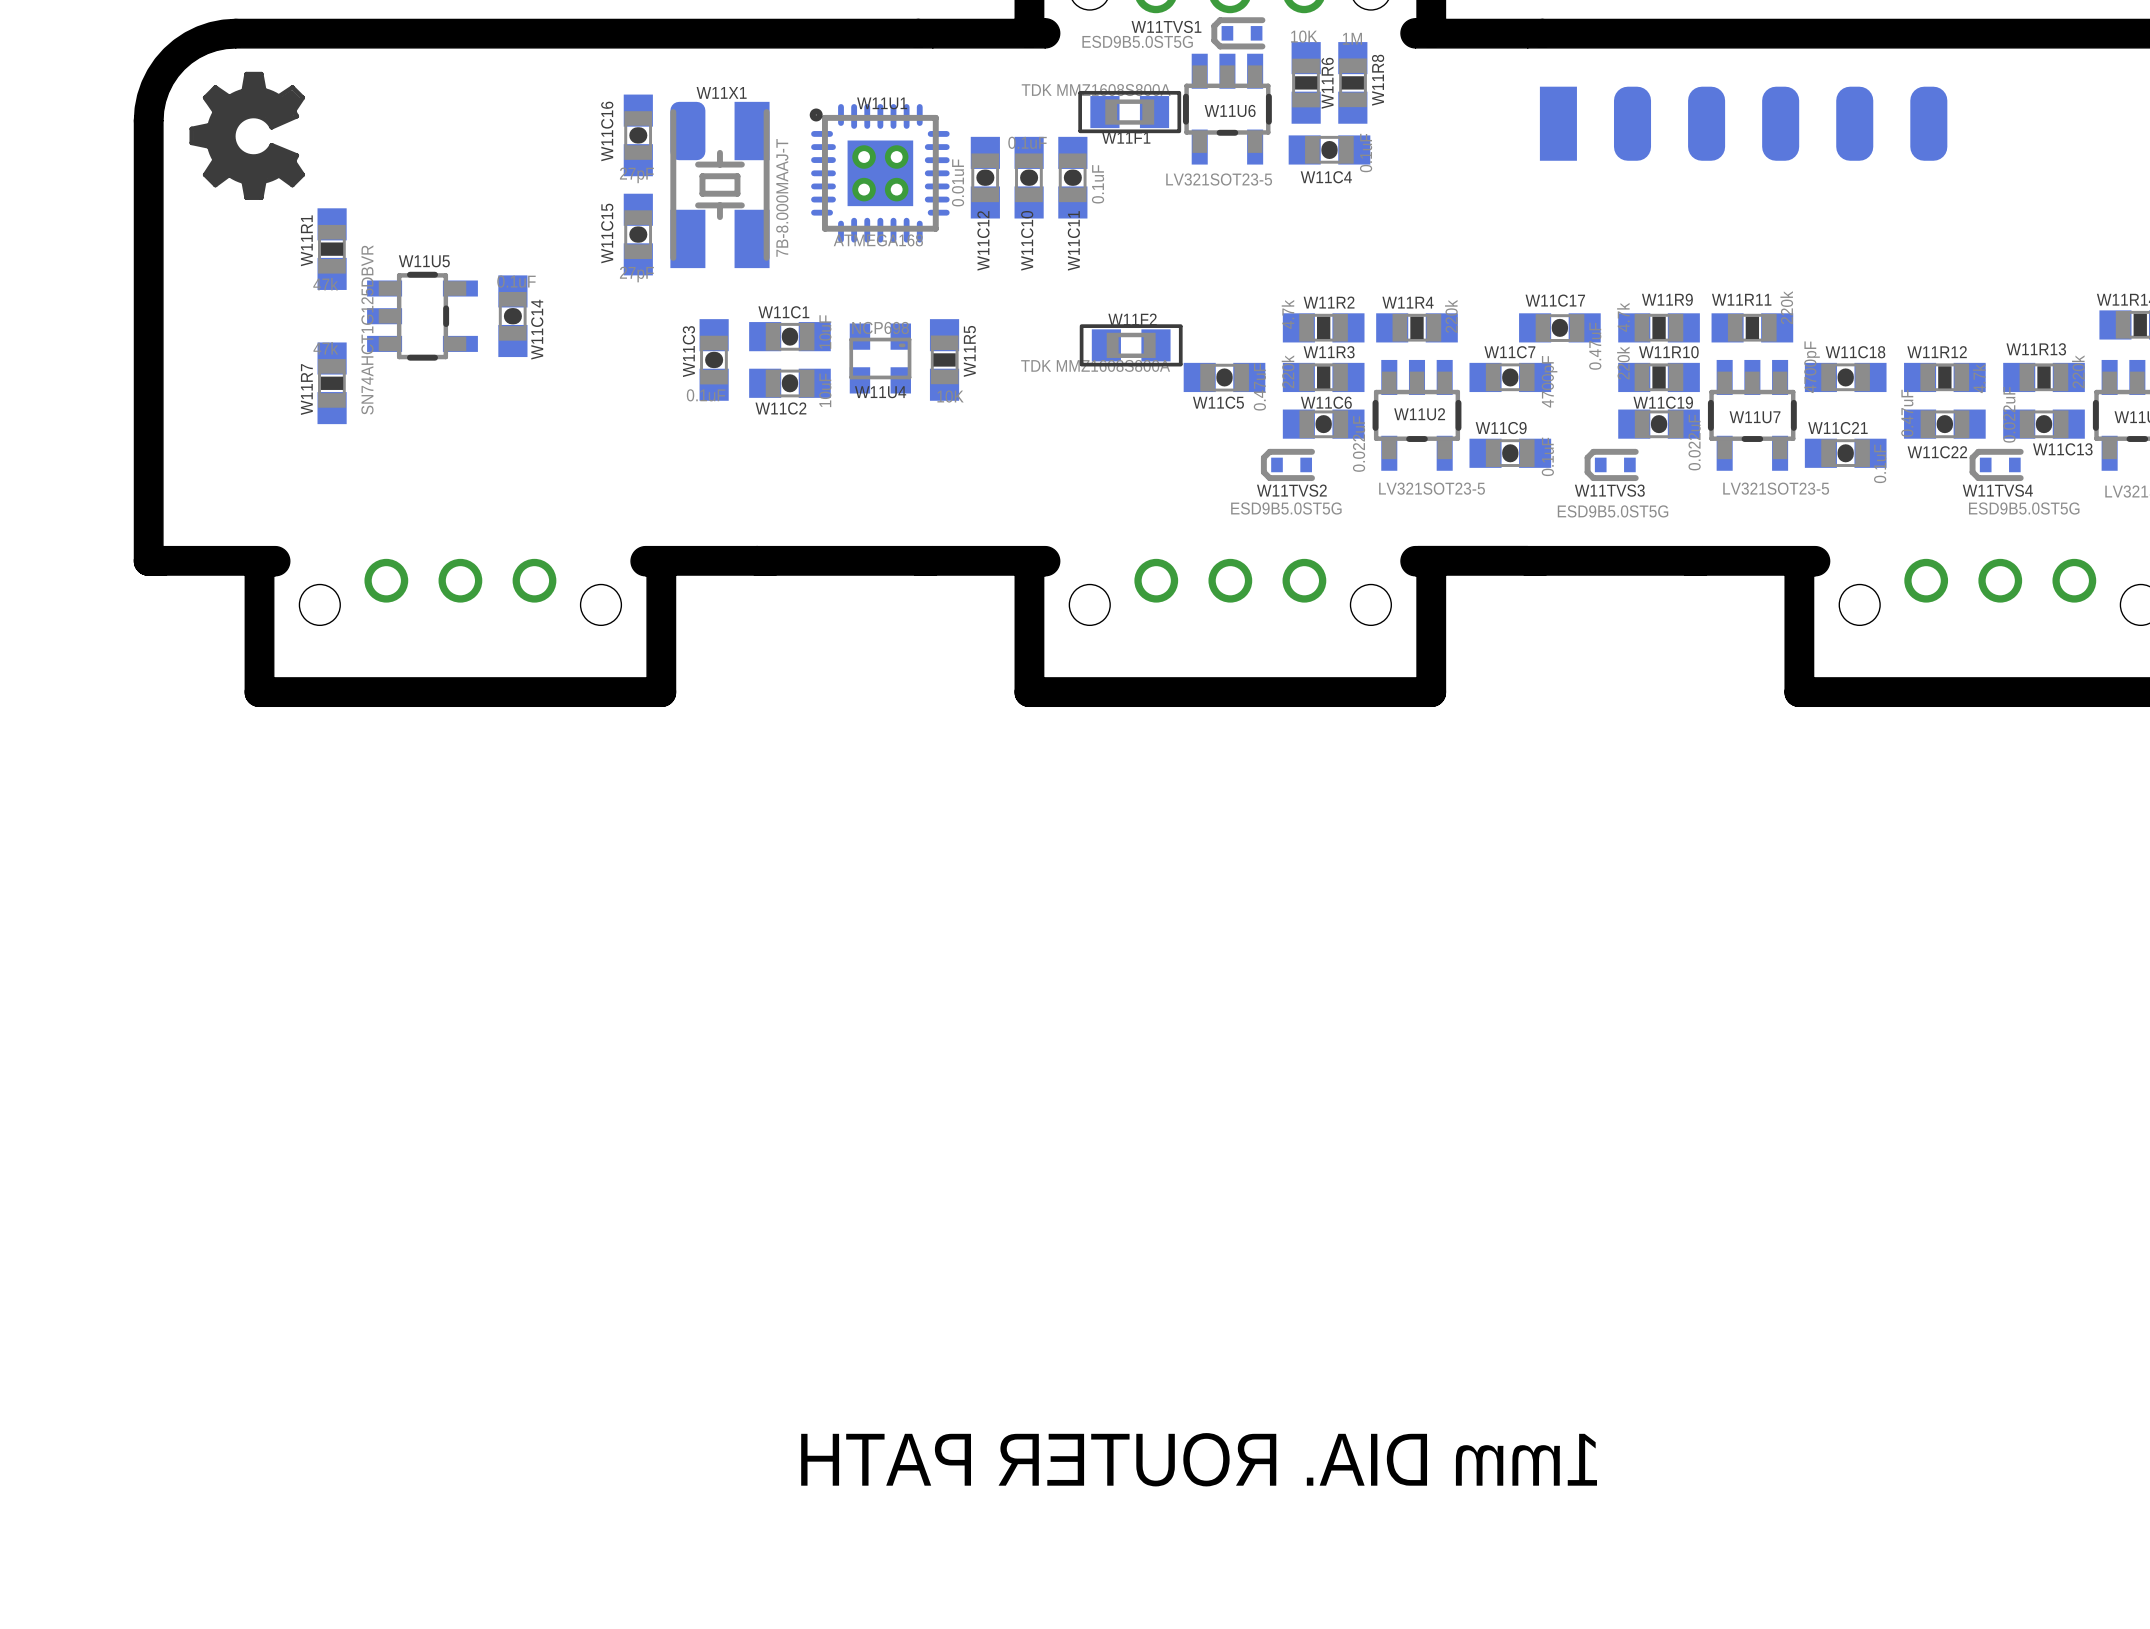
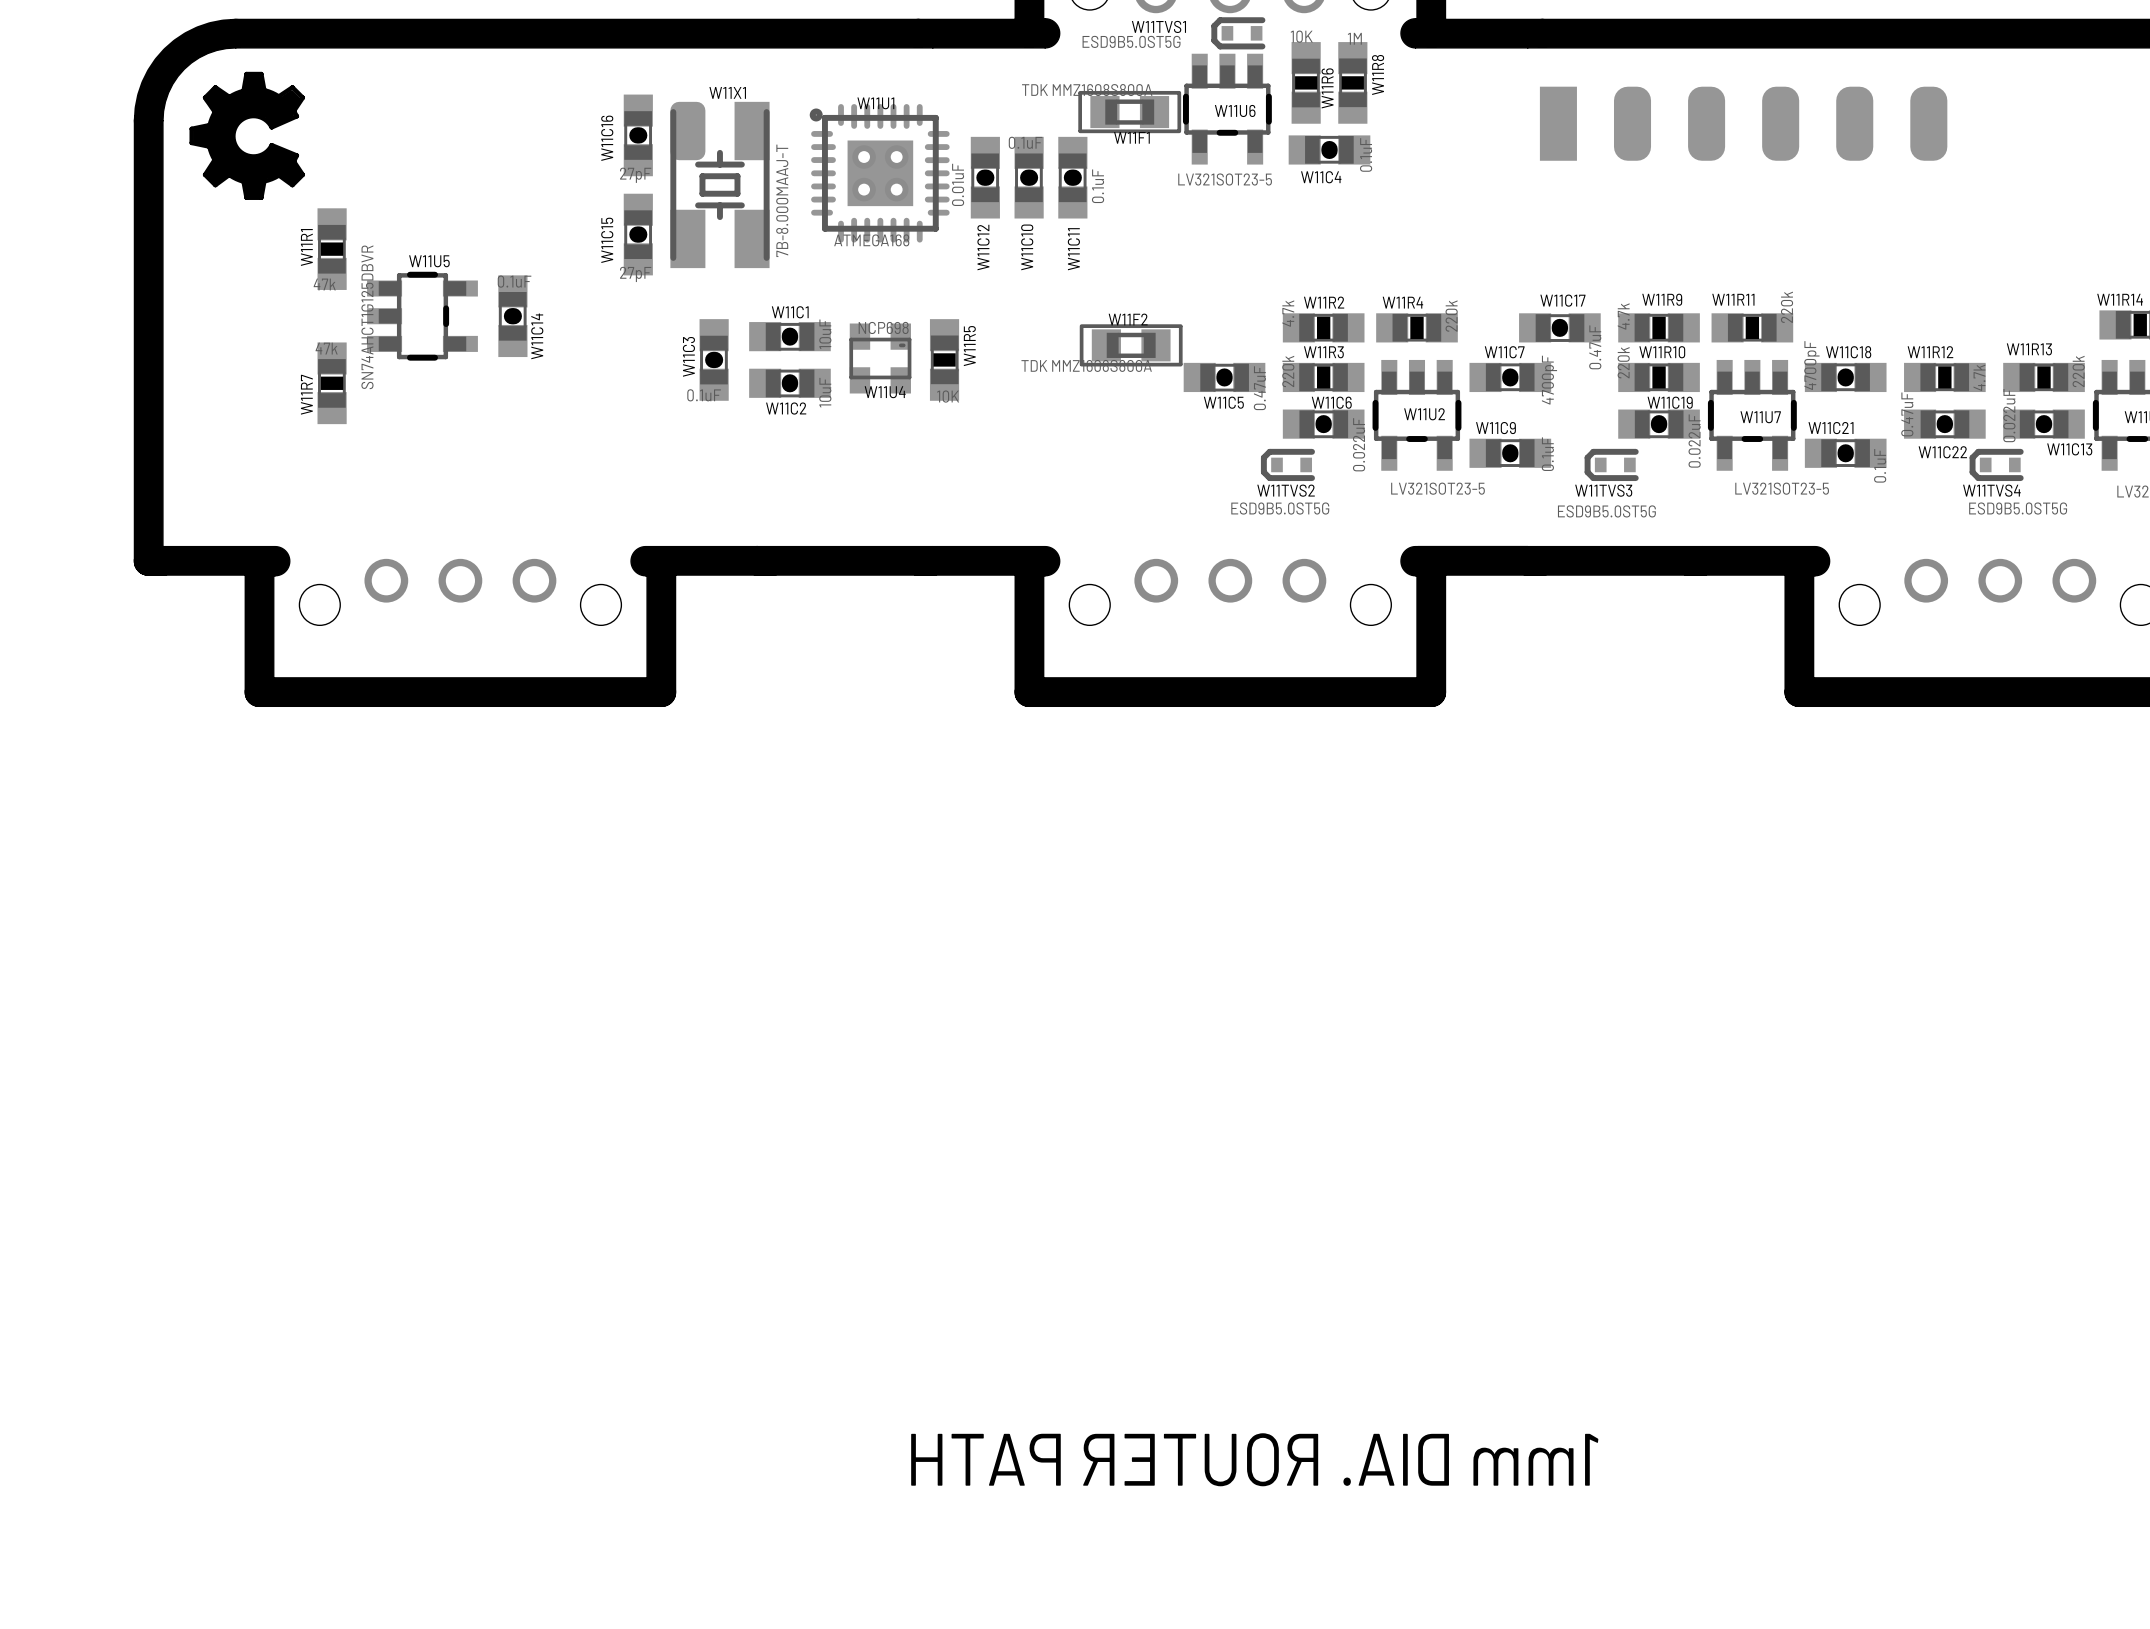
W11F1 footprint: [1078, 90, 1182, 134] -> [1078, 90, 1182, 134]
W11U1 footprint: [809, 104, 950, 243] -> [809, 104, 950, 243]
W11F2 footprint: [1079, 324, 1183, 367] -> [1079, 324, 1183, 367]

